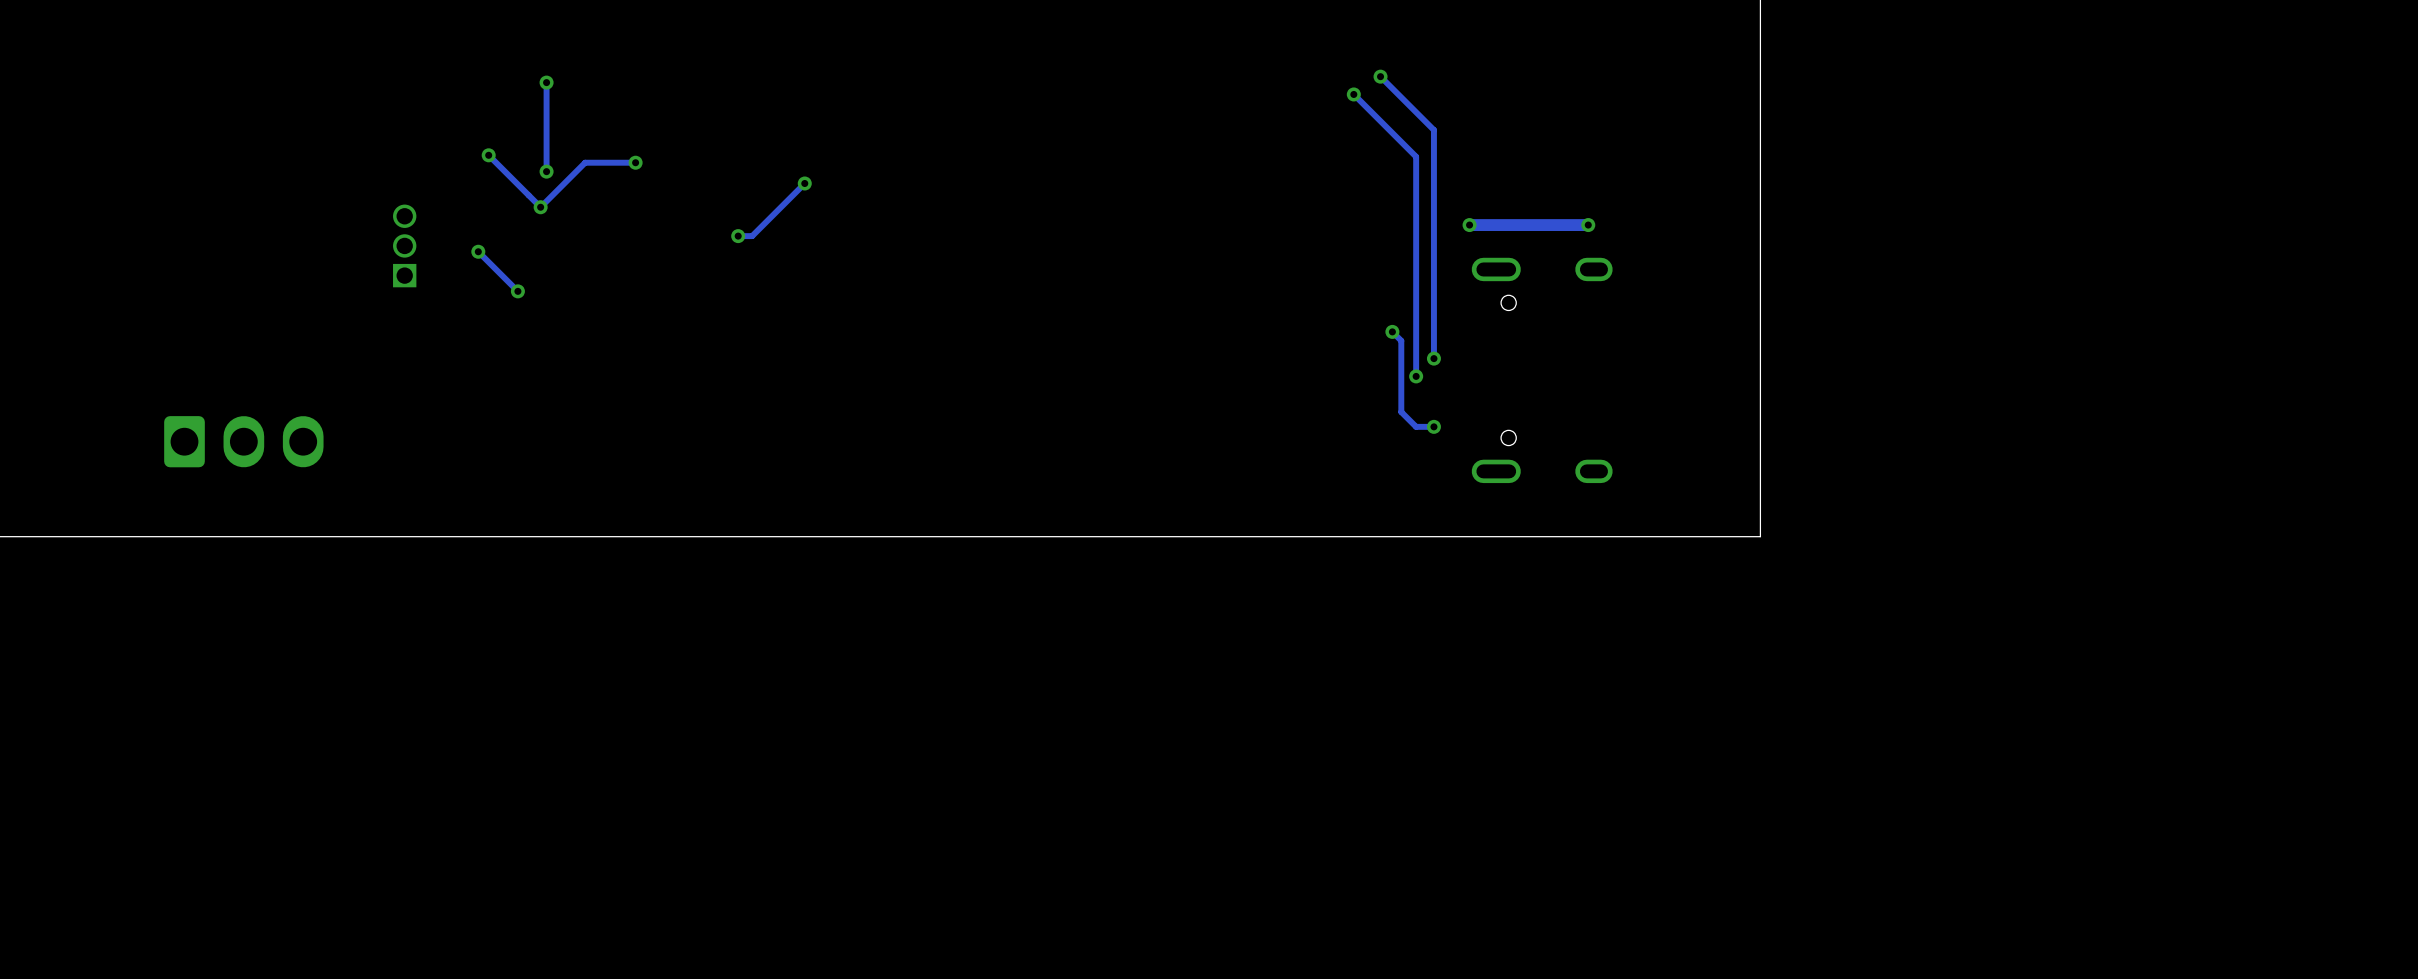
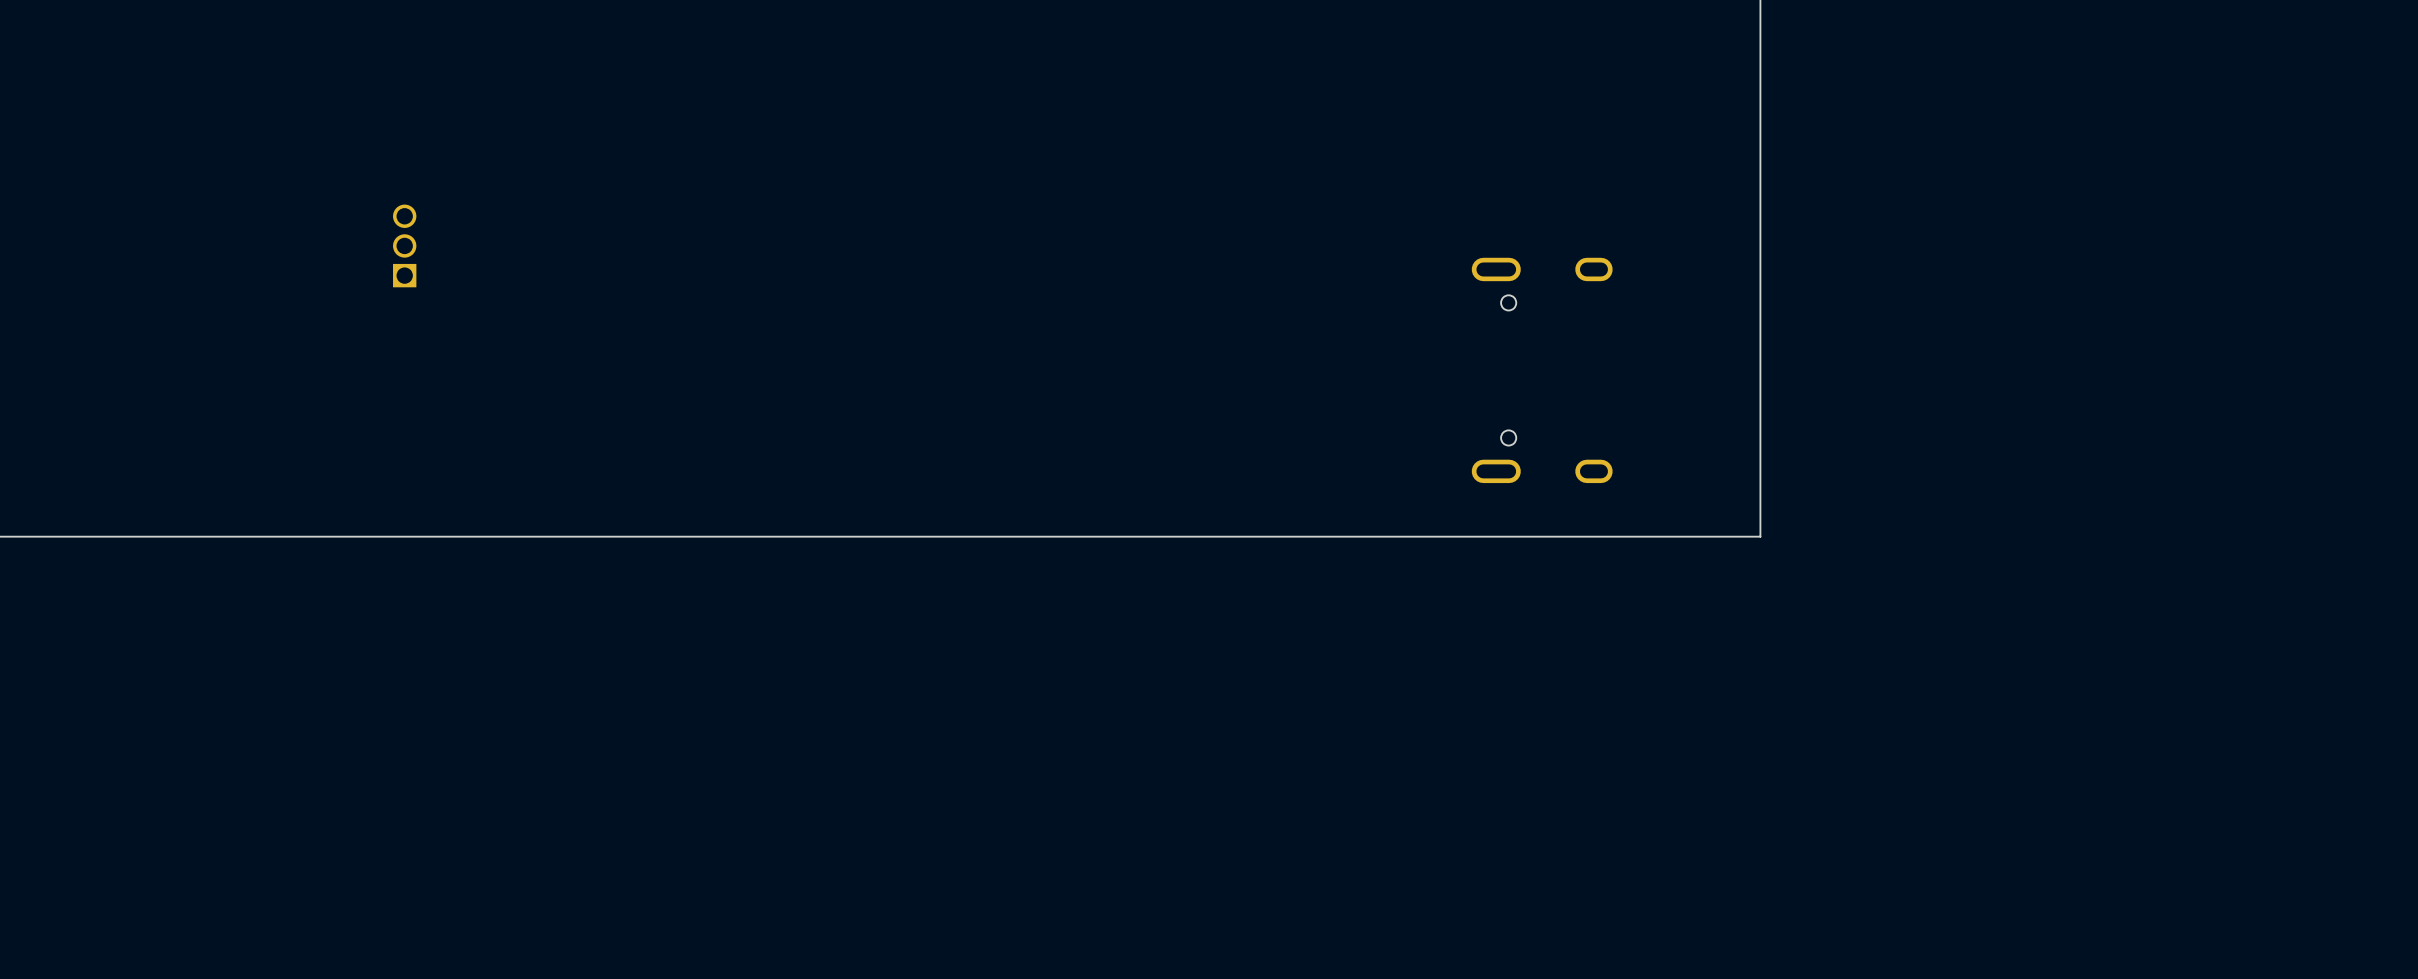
track: (1380, 76) (1433, 130) (1433, 358) -> none
via: (1380, 76) -> none
track: (546, 82) (546, 171) -> none
via: (546, 82) -> none
track: (1353, 94) (1416, 156) (1416, 376) -> none
via: (1353, 94) -> none
track: (488, 155) (540, 207) (585, 162) (635, 162) -> none
via: (488, 155) -> none
via: (635, 162) -> none
via: (546, 171) -> none
track: (804, 183) (752, 236) (738, 236) -> none
via: (804, 183) -> none
via: (540, 207) -> none
via: (1469, 225) -> none
track: (1588, 225) (1469, 225) -> none
via: (1588, 225) -> none
via: (738, 236) -> none
track: (478, 251) (517, 291) -> none
via: (478, 251) -> none
via: (517, 291) -> none
track: (1392, 331) (1401, 340) (1401, 412) (1416, 426) (1433, 426) -> none
via: (1392, 331) -> none
via: (1433, 358) -> none
via: (1416, 376) -> none
via: (1433, 426) -> none
part: (243, 441) -> none

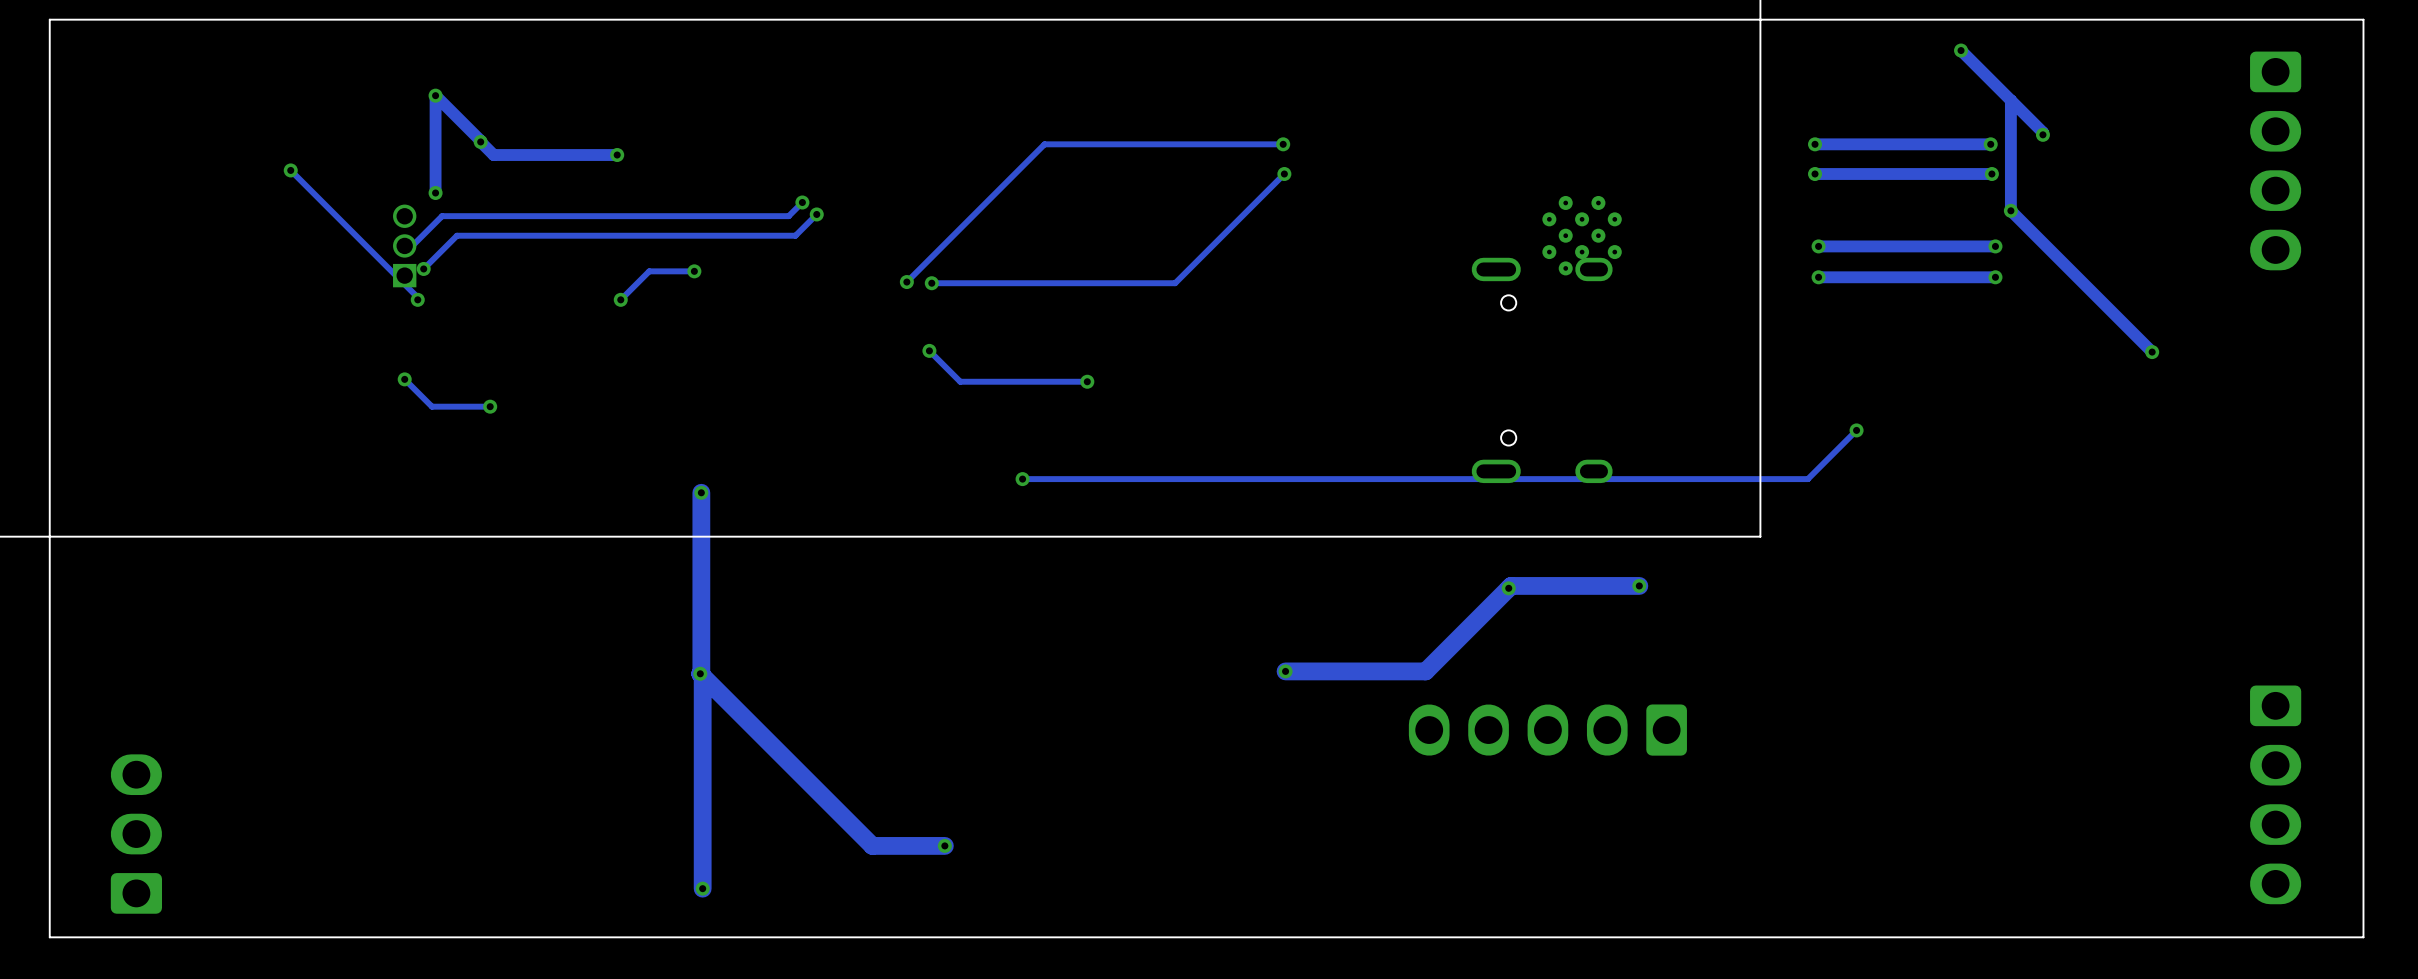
board edge: none -> (2363, 19) (2363, 937) (49, 937) (49, 19) (2363, 19)
track: none -> (1961, 50) (2042, 132) (2042, 134)
via: none -> (1961, 50)
via: none -> (435, 95)
track: none -> (2010, 100) (2010, 210) (2152, 352)
via: none -> (2042, 134)
via: none -> (480, 141)
track: none -> (1283, 144) (1044, 144) (906, 282)
via: none -> (1283, 144)
via: none -> (1815, 144)
track: none -> (1990, 144) (1815, 144)
via: none -> (1990, 144)
track: none -> (617, 155) (493, 155) (435, 95) (435, 193)
via: none -> (617, 155)
part: none -> (2275, 160)
track: none -> (290, 170) (417, 297) (417, 299)
via: none -> (290, 170)
track: none -> (1284, 174) (1175, 283) (931, 283)
via: none -> (1284, 174)
via: none -> (1815, 174)
track: none -> (1991, 174) (1815, 174)
via: none -> (1991, 174)
via: none -> (435, 193)
track: none -> (802, 202) (788, 216) (442, 216) (408, 249)
via: none -> (802, 202)
via: none -> (2010, 210)
track: none -> (816, 214) (795, 235) (456, 235) (423, 268)
via: none -> (816, 214)
part: none -> (1582, 235)
via: none -> (1818, 246)
track: none -> (1995, 246) (1818, 246)
via: none -> (1995, 246)
via: none -> (423, 268)
track: none -> (694, 271) (649, 271) (620, 299)
via: none -> (694, 271)
via: none -> (1818, 277)
track: none -> (1995, 277) (1818, 277)
via: none -> (1995, 277)
via: none -> (906, 282)
via: none -> (931, 283)
via: none -> (417, 299)
via: none -> (620, 299)
track: none -> (929, 350) (960, 381) (1087, 381)
via: none -> (929, 350)
via: none -> (2152, 352)
track: none -> (404, 379) (432, 406) (490, 406)
via: none -> (404, 379)
via: none -> (1087, 381)
via: none -> (490, 406)
track: none -> (1856, 430) (1807, 479) (1022, 479)
via: none -> (1856, 430)
via: none -> (1022, 479)
track: none -> (701, 492) (700, 673) (872, 845) (944, 845)
via: none -> (701, 492)
track: none -> (1639, 585) (1511, 585) (1425, 671) (1285, 671)
via: none -> (1639, 585)
via: none -> (1508, 588)
via: none -> (1285, 671)
via: none -> (700, 673)
track: none -> (702, 676) (702, 888)
part: none -> (1547, 730)
part: none -> (2275, 794)
part: none -> (136, 834)
via: none -> (944, 845)
via: none -> (702, 888)

